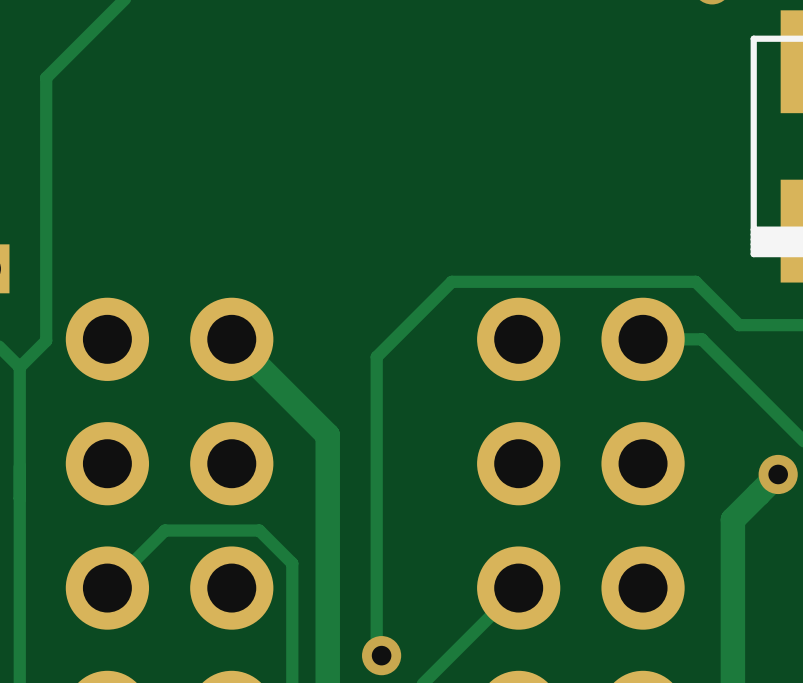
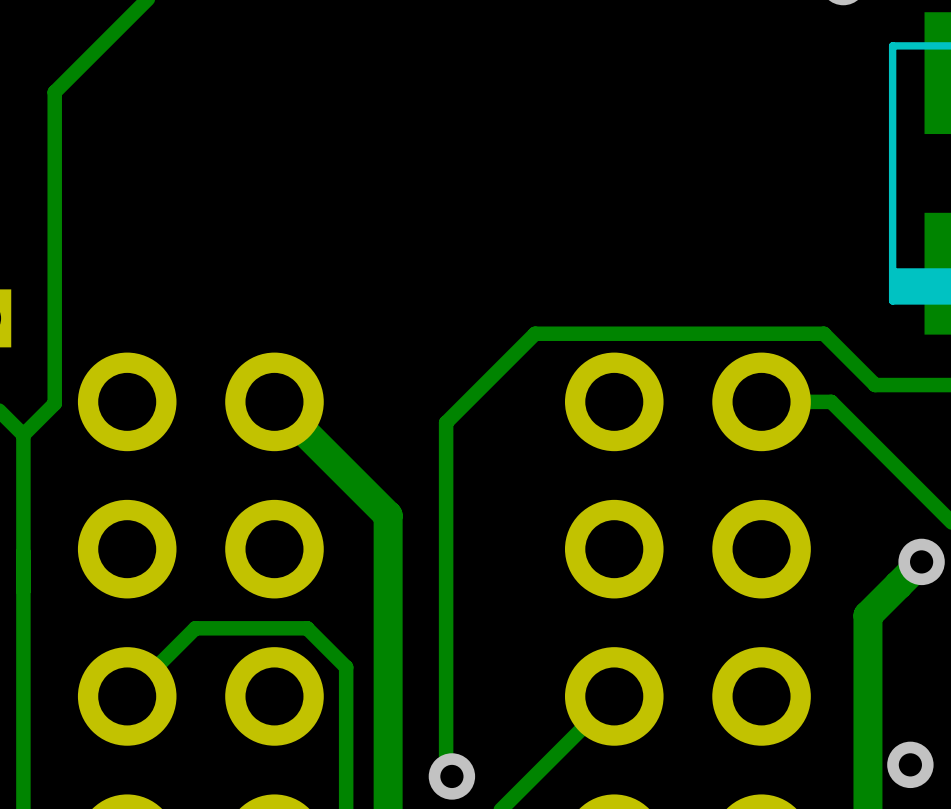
via: none -> (910, 764)

